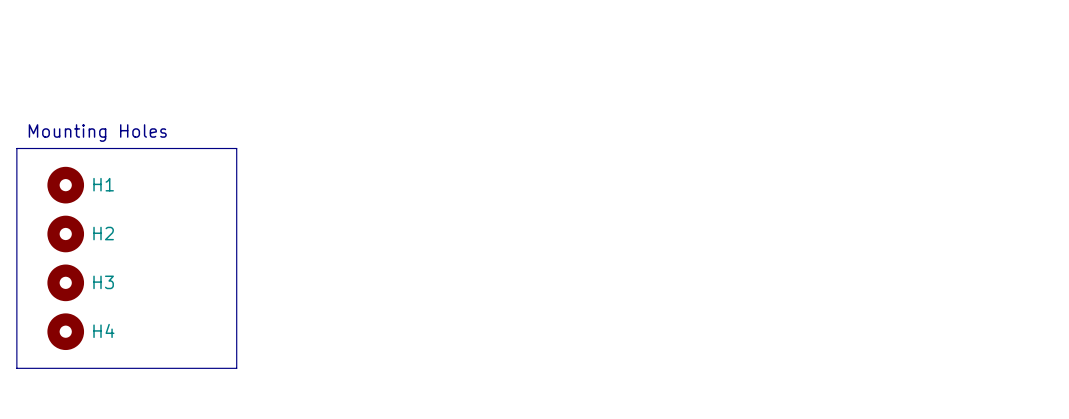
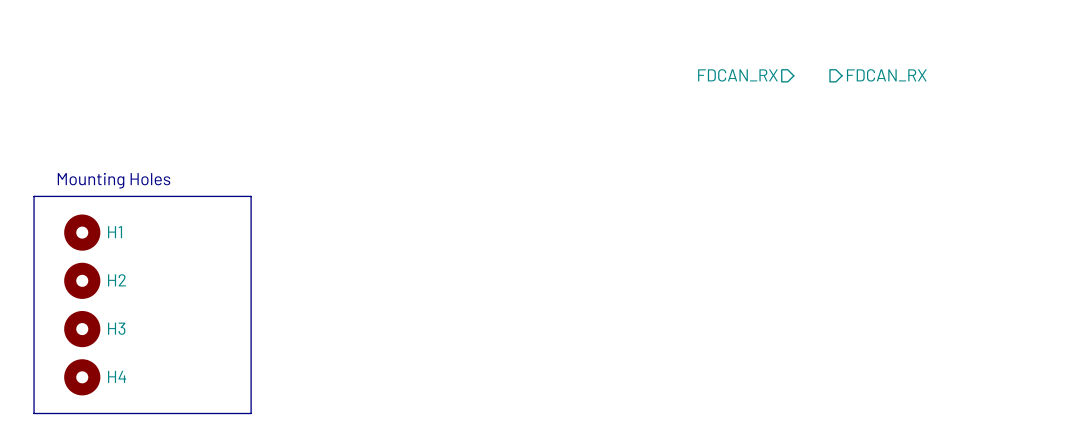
sheet pin: none -> FDCAN_RX (737, 75)
sheet pin: none -> FDCAN_RX (886, 75)

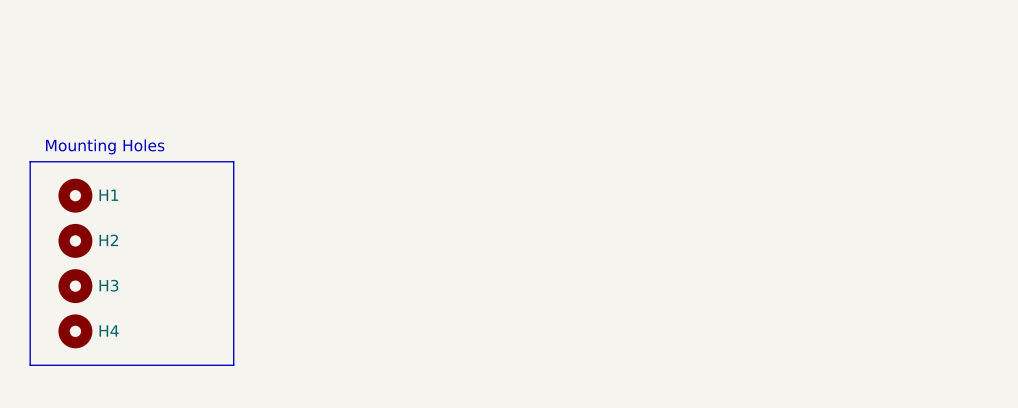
sheet pin: FDCAN_RX (737, 75) -> none
sheet pin: FDCAN_RX (886, 75) -> none

